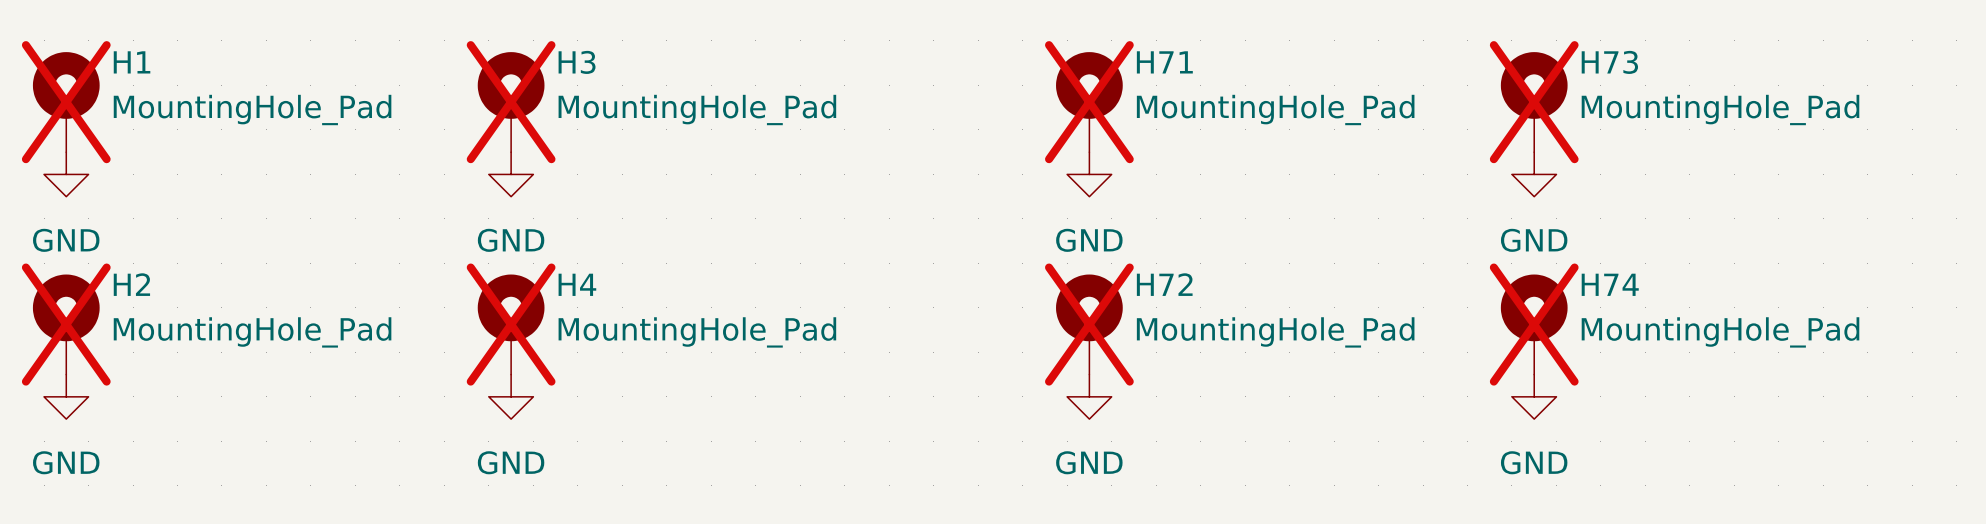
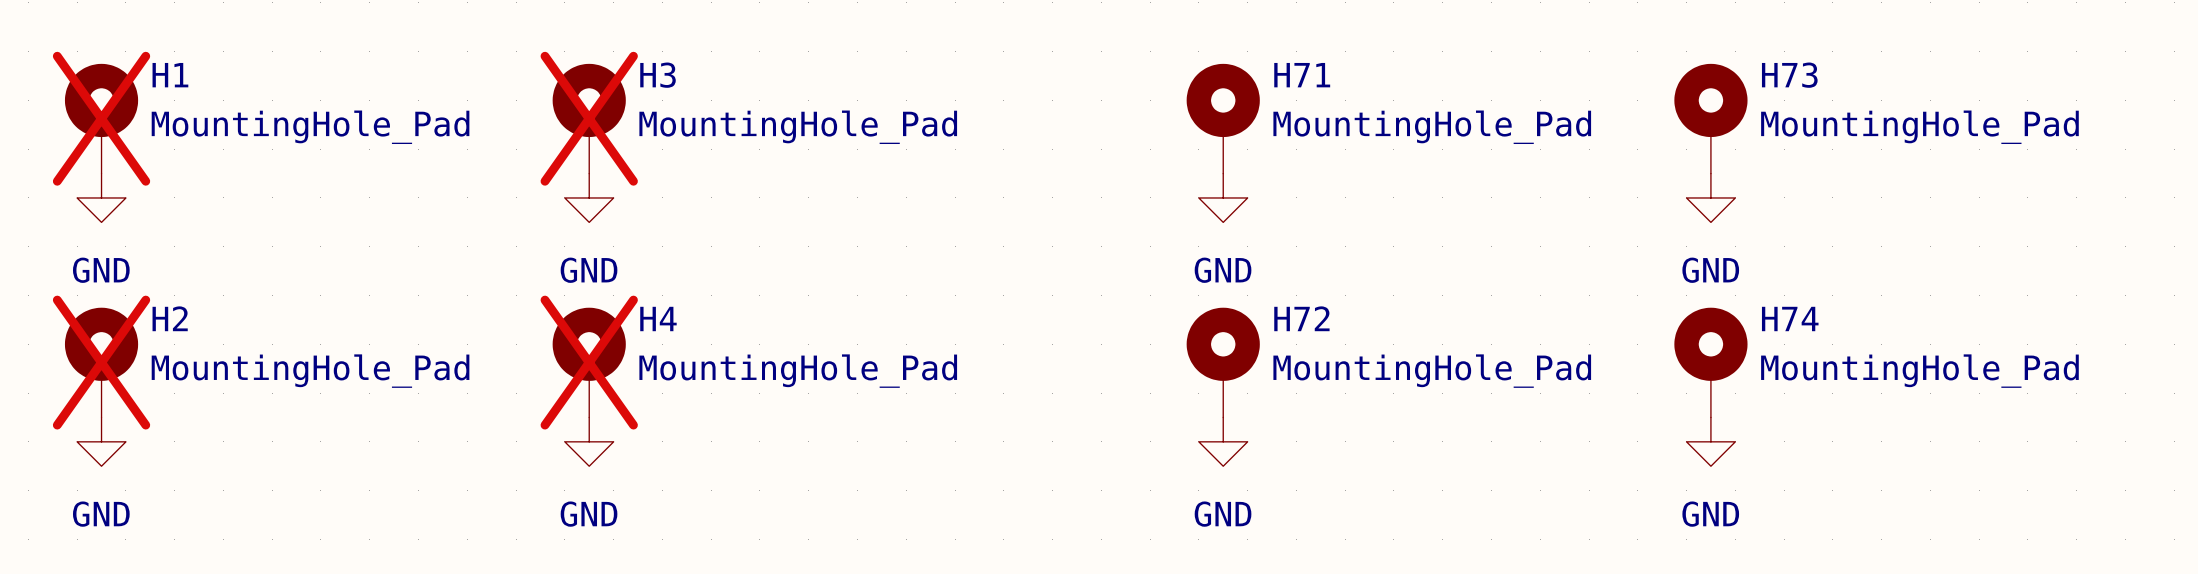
H71 do-not-place cross: (1089, 102) -> none
H73 do-not-place cross: (1534, 102) -> none
H72 do-not-place cross: (1089, 324) -> none
H74 do-not-place cross: (1534, 324) -> none

